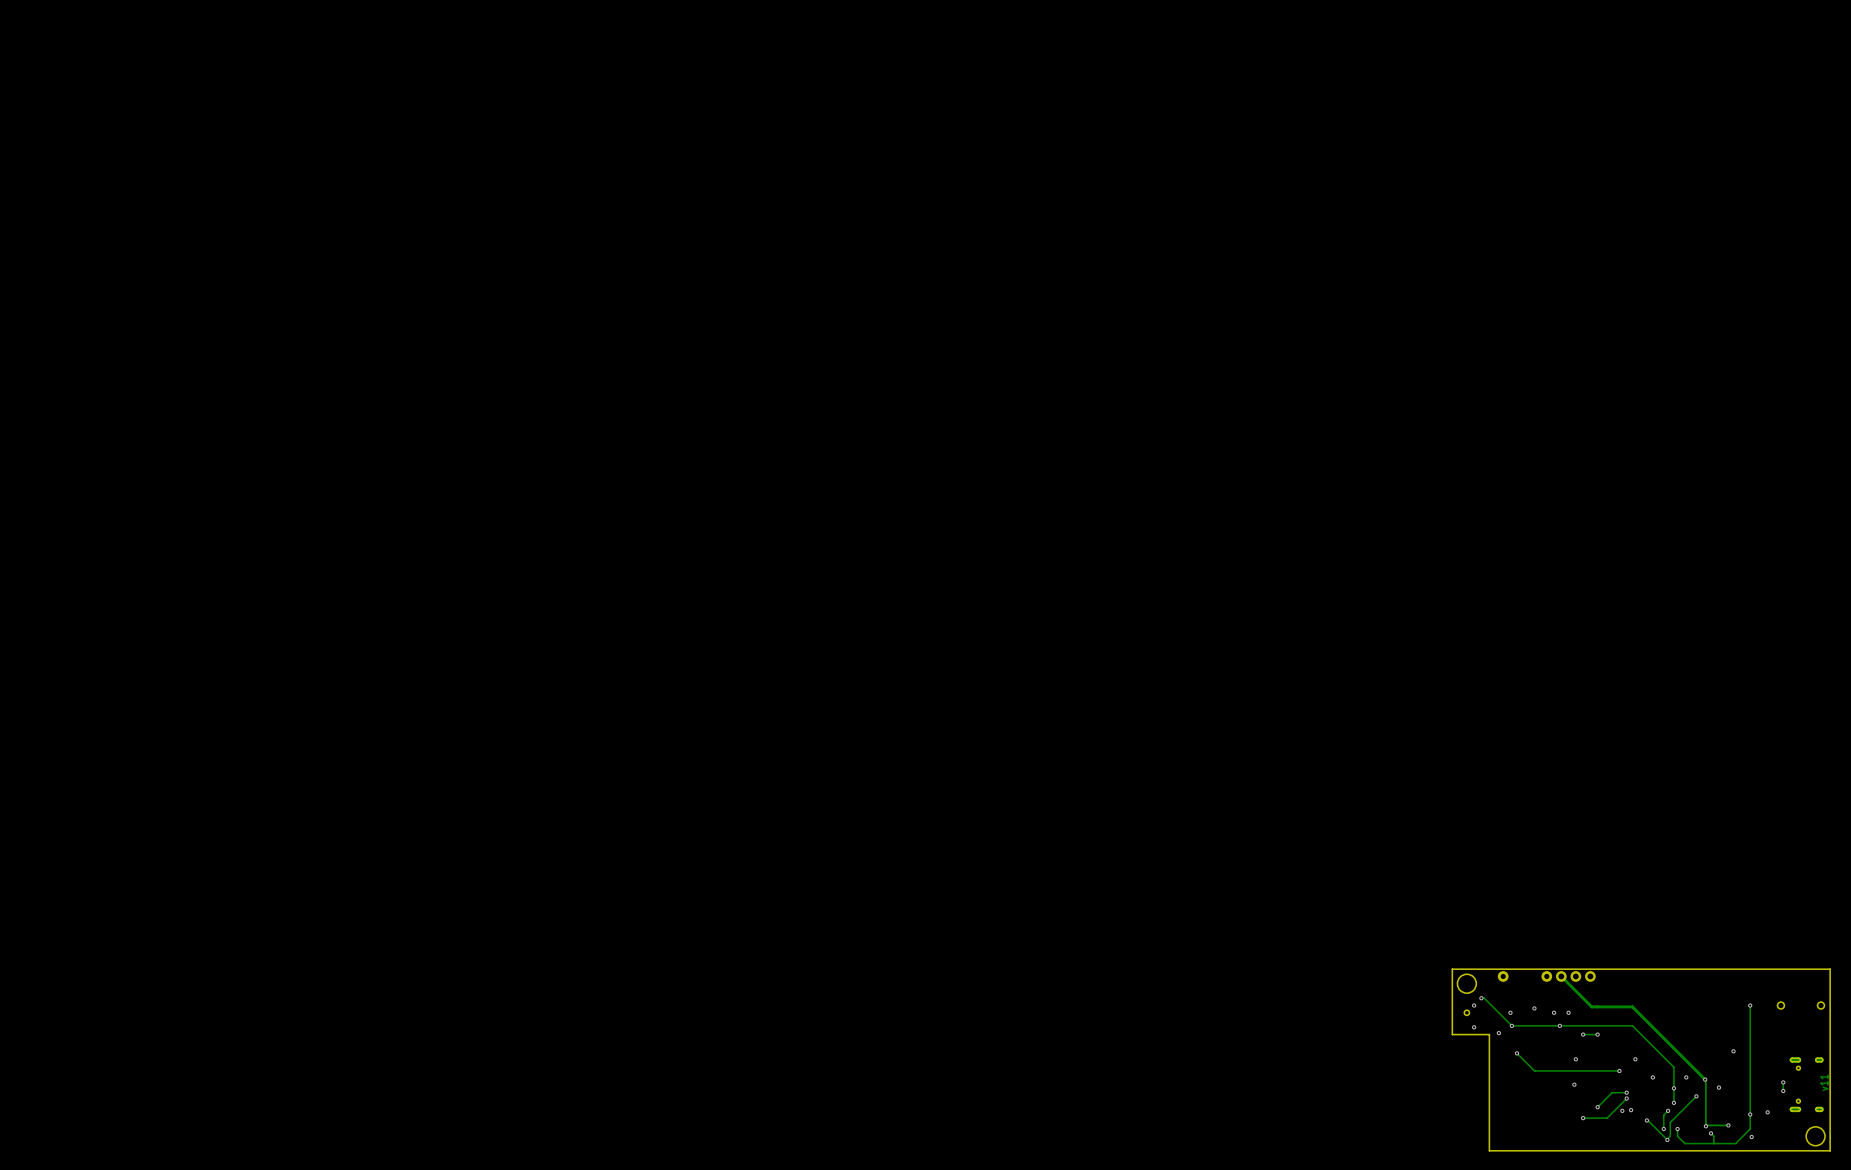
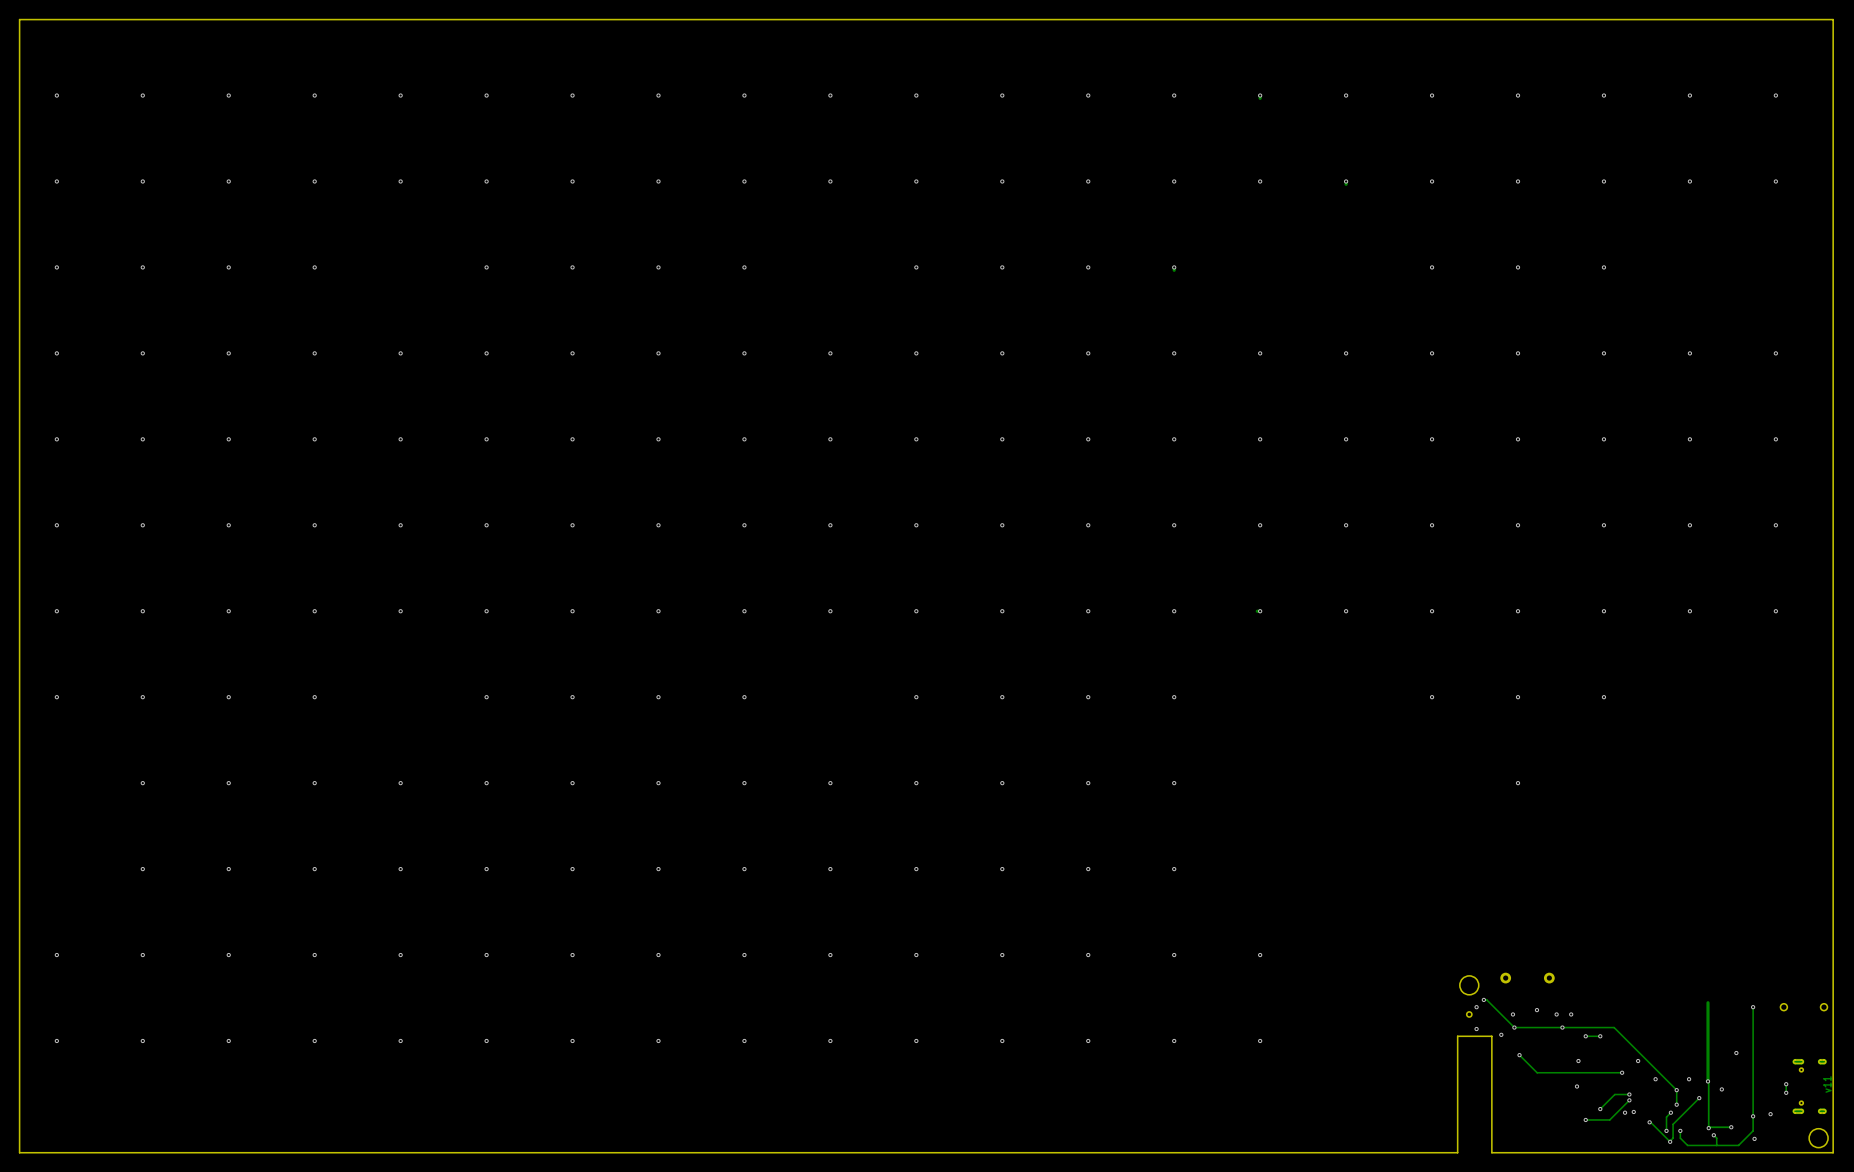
via: none -> (56, 95)
via: none -> (142, 95)
via: none -> (228, 95)
via: none -> (314, 95)
via: none -> (400, 95)
via: none -> (486, 95)
via: none -> (572, 95)
via: none -> (658, 95)
via: none -> (744, 95)
via: none -> (830, 95)
via: none -> (916, 95)
via: none -> (1002, 95)
via: none -> (1088, 95)
via: none -> (1174, 95)
track: none -> (1260, 95) (1260, 98)
via: none -> (1260, 95)
via: none -> (1346, 95)
via: none -> (1432, 95)
via: none -> (1518, 95)
via: none -> (1603, 95)
via: none -> (1689, 95)
via: none -> (1775, 95)
via: none -> (56, 181)
via: none -> (142, 181)
via: none -> (228, 181)
via: none -> (314, 181)
via: none -> (400, 181)
via: none -> (486, 181)
via: none -> (572, 181)
via: none -> (658, 181)
via: none -> (744, 181)
via: none -> (830, 181)
via: none -> (916, 181)
via: none -> (1002, 181)
via: none -> (1088, 181)
via: none -> (1174, 181)
via: none -> (1260, 181)
track: none -> (1346, 181) (1346, 184)
via: none -> (1346, 181)
via: none -> (1432, 181)
via: none -> (1518, 181)
via: none -> (1603, 181)
via: none -> (1689, 181)
via: none -> (1775, 181)
via: none -> (56, 267)
via: none -> (142, 267)
via: none -> (228, 267)
via: none -> (314, 267)
via: none -> (486, 267)
via: none -> (572, 267)
via: none -> (658, 267)
via: none -> (744, 267)
via: none -> (916, 267)
via: none -> (1002, 267)
via: none -> (1088, 267)
track: none -> (1174, 267) (1174, 270)
via: none -> (1174, 267)
via: none -> (1432, 267)
via: none -> (1518, 267)
via: none -> (1603, 267)
via: none -> (56, 353)
via: none -> (142, 353)
via: none -> (228, 353)
via: none -> (314, 353)
via: none -> (400, 353)
via: none -> (486, 353)
via: none -> (572, 353)
via: none -> (658, 353)
via: none -> (744, 353)
via: none -> (830, 353)
via: none -> (916, 353)
via: none -> (1002, 353)
via: none -> (1088, 353)
via: none -> (1174, 353)
via: none -> (1260, 353)
via: none -> (1346, 353)
via: none -> (1432, 353)
via: none -> (1518, 353)
via: none -> (1603, 353)
via: none -> (1689, 353)
via: none -> (1775, 353)
via: none -> (56, 439)
via: none -> (142, 439)
via: none -> (228, 439)
via: none -> (314, 439)
via: none -> (400, 439)
via: none -> (486, 439)
via: none -> (572, 439)
via: none -> (658, 439)
via: none -> (744, 439)
via: none -> (830, 439)
via: none -> (916, 439)
via: none -> (1002, 439)
via: none -> (1088, 439)
via: none -> (1174, 439)
via: none -> (1260, 439)
via: none -> (1346, 439)
via: none -> (1432, 439)
via: none -> (1518, 439)
via: none -> (1603, 439)
via: none -> (1689, 439)
via: none -> (1775, 439)
via: none -> (56, 525)
via: none -> (142, 525)
via: none -> (228, 525)
via: none -> (314, 525)
via: none -> (400, 525)
via: none -> (486, 525)
via: none -> (572, 525)
via: none -> (658, 525)
via: none -> (744, 525)
via: none -> (830, 525)
via: none -> (916, 525)
via: none -> (1002, 525)
via: none -> (1088, 525)
via: none -> (1174, 525)
via: none -> (1260, 525)
via: none -> (1346, 525)
via: none -> (1432, 525)
via: none -> (1518, 525)
via: none -> (1603, 525)
via: none -> (1689, 525)
via: none -> (1775, 525)
via: none -> (56, 611)
via: none -> (142, 611)
via: none -> (228, 611)
via: none -> (314, 611)
via: none -> (400, 611)
via: none -> (486, 611)
via: none -> (572, 611)
via: none -> (658, 611)
via: none -> (744, 611)
via: none -> (830, 611)
via: none -> (916, 611)
via: none -> (1002, 611)
via: none -> (1088, 611)
via: none -> (1174, 611)
track: none -> (1260, 611) (1257, 611)
via: none -> (1260, 611)
via: none -> (1346, 611)
via: none -> (1432, 611)
via: none -> (1518, 611)
via: none -> (1603, 611)
via: none -> (1689, 611)
via: none -> (1775, 611)
via: none -> (56, 697)
via: none -> (142, 697)
via: none -> (228, 697)
via: none -> (314, 697)
via: none -> (486, 697)
via: none -> (572, 697)
via: none -> (658, 697)
via: none -> (744, 697)
via: none -> (916, 697)
via: none -> (1002, 697)
via: none -> (1088, 697)
via: none -> (1174, 697)
via: none -> (1432, 697)
via: none -> (1518, 697)
via: none -> (1603, 697)
via: none -> (142, 783)
via: none -> (228, 783)
via: none -> (314, 783)
via: none -> (400, 783)
via: none -> (486, 783)
via: none -> (572, 783)
via: none -> (658, 783)
via: none -> (744, 783)
via: none -> (830, 783)
via: none -> (916, 783)
via: none -> (1002, 783)
via: none -> (1088, 783)
via: none -> (1174, 783)
via: none -> (1518, 783)
via: none -> (142, 869)
via: none -> (228, 869)
via: none -> (314, 869)
via: none -> (400, 869)
via: none -> (486, 869)
via: none -> (572, 869)
via: none -> (658, 869)
via: none -> (744, 869)
via: none -> (830, 869)
via: none -> (916, 869)
via: none -> (1002, 869)
via: none -> (1088, 869)
via: none -> (1174, 869)
via: none -> (56, 955)
via: none -> (142, 955)
via: none -> (228, 955)
via: none -> (314, 955)
via: none -> (400, 955)
via: none -> (486, 955)
via: none -> (572, 955)
via: none -> (658, 955)
via: none -> (744, 955)
via: none -> (830, 955)
via: none -> (916, 955)
via: none -> (1002, 955)
via: none -> (1088, 955)
via: none -> (1174, 955)
via: none -> (1260, 955)
board edge: (1830, 969) (1452, 969) (1452, 1034) (1455, 1034) -> (1833, 970) (1833, 19) (19, 19) (19, 1152) (1457, 1152) (1457, 1036)
track: (1561, 976) (1591, 1006) (1632, 1006) (1705, 1079) -> (1707, 1002) (1707, 1081)
part: (1575, 976) -> none
track: (1611, 1025) (1632, 1025) (1673, 1067) (1673, 1088) -> (1614, 1027) (1676, 1090)
via: none -> (56, 1040)
via: none -> (142, 1040)
via: none -> (228, 1040)
via: none -> (314, 1040)
via: none -> (400, 1040)
via: none -> (486, 1040)
via: none -> (572, 1040)
via: none -> (658, 1040)
via: none -> (744, 1040)
via: none -> (830, 1040)
via: none -> (916, 1040)
via: none -> (1002, 1040)
via: none -> (1088, 1040)
via: none -> (1174, 1040)
via: none -> (1260, 1040)

